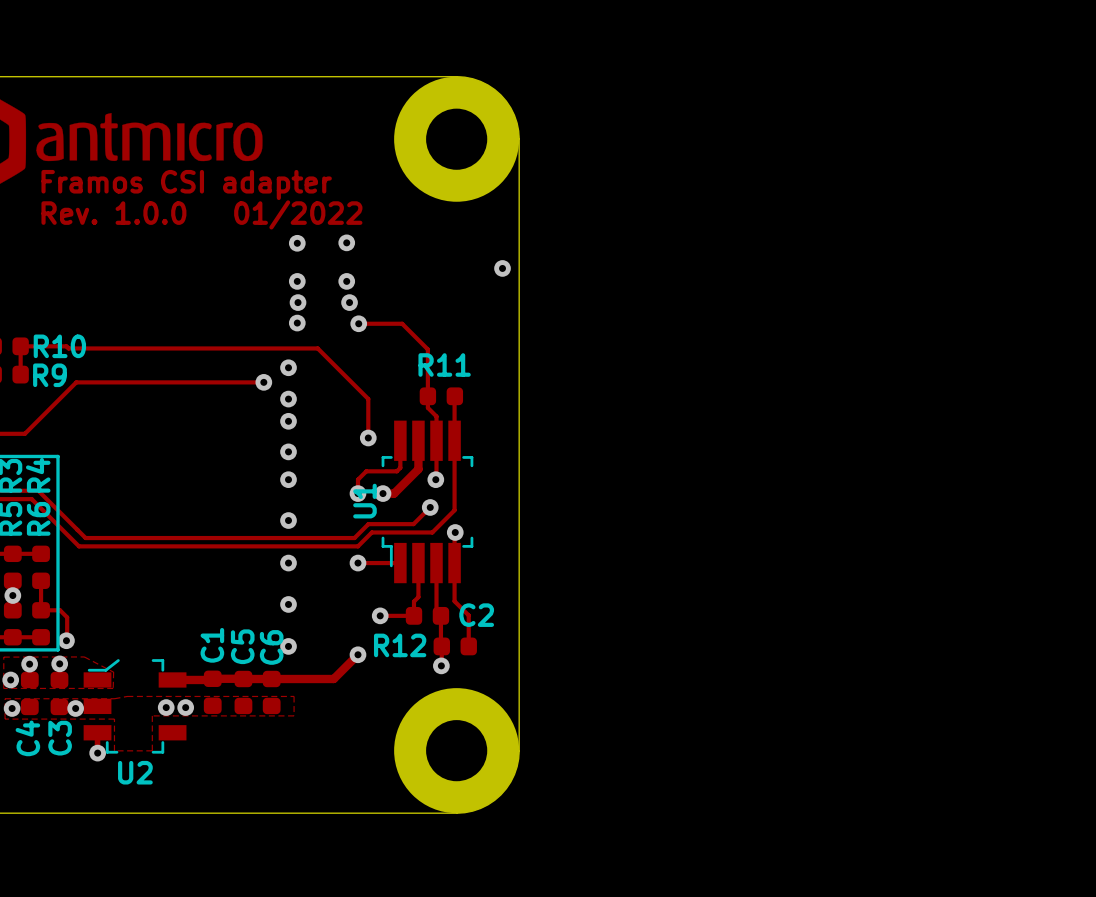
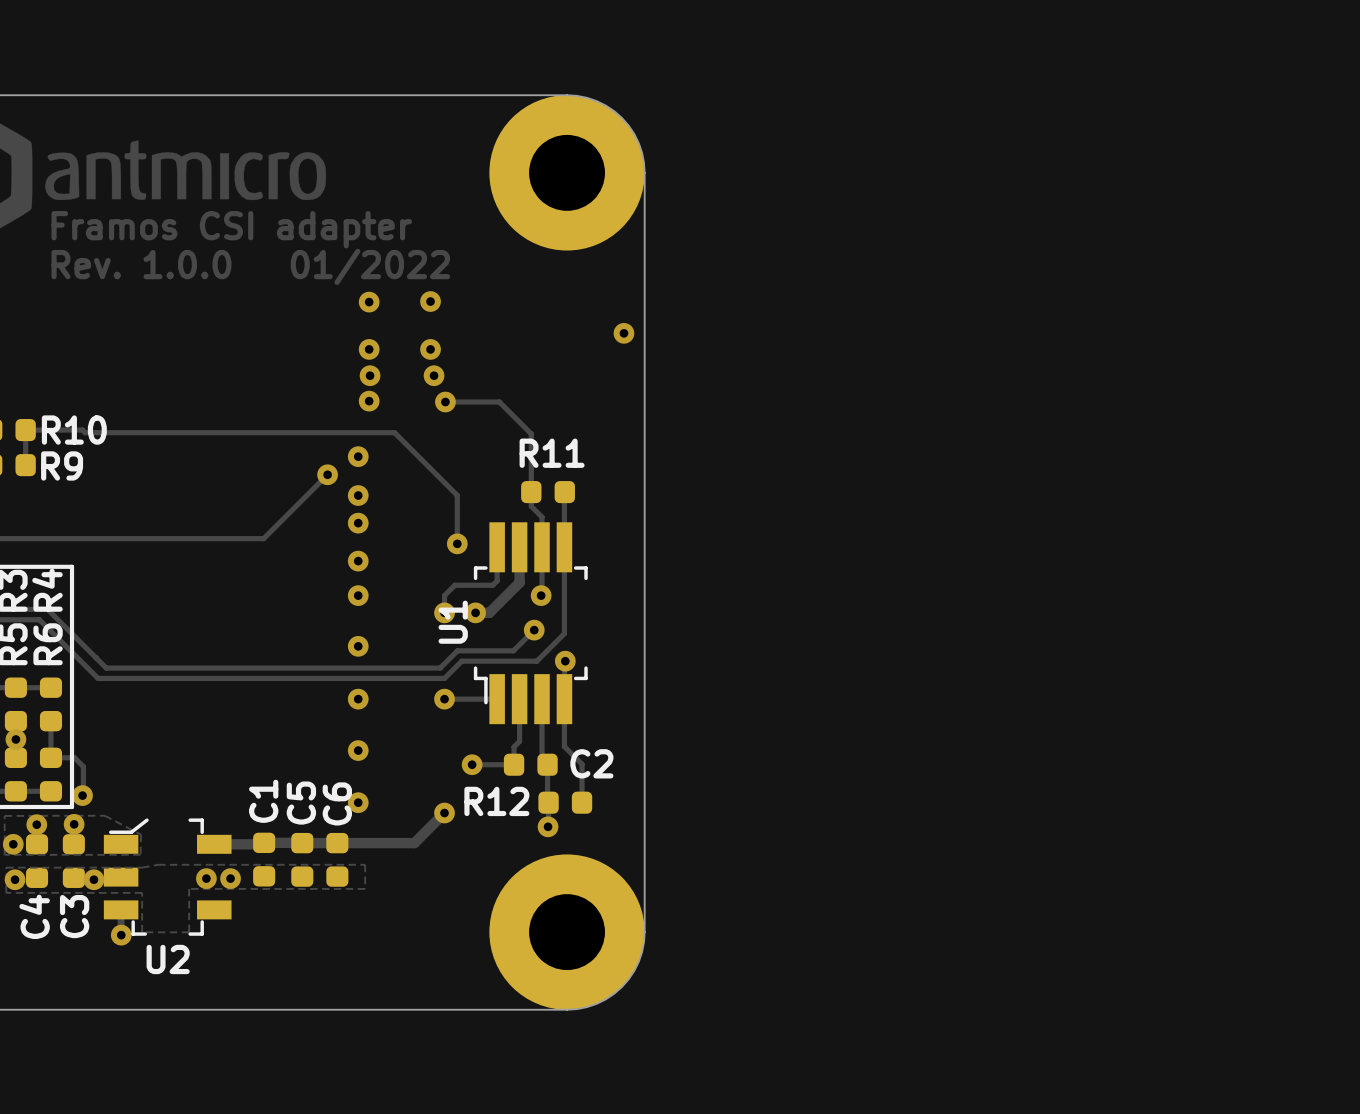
track: (263, 382) (76, 382) (24, 433) -> (327, 474) (263, 538) (30, 538)

